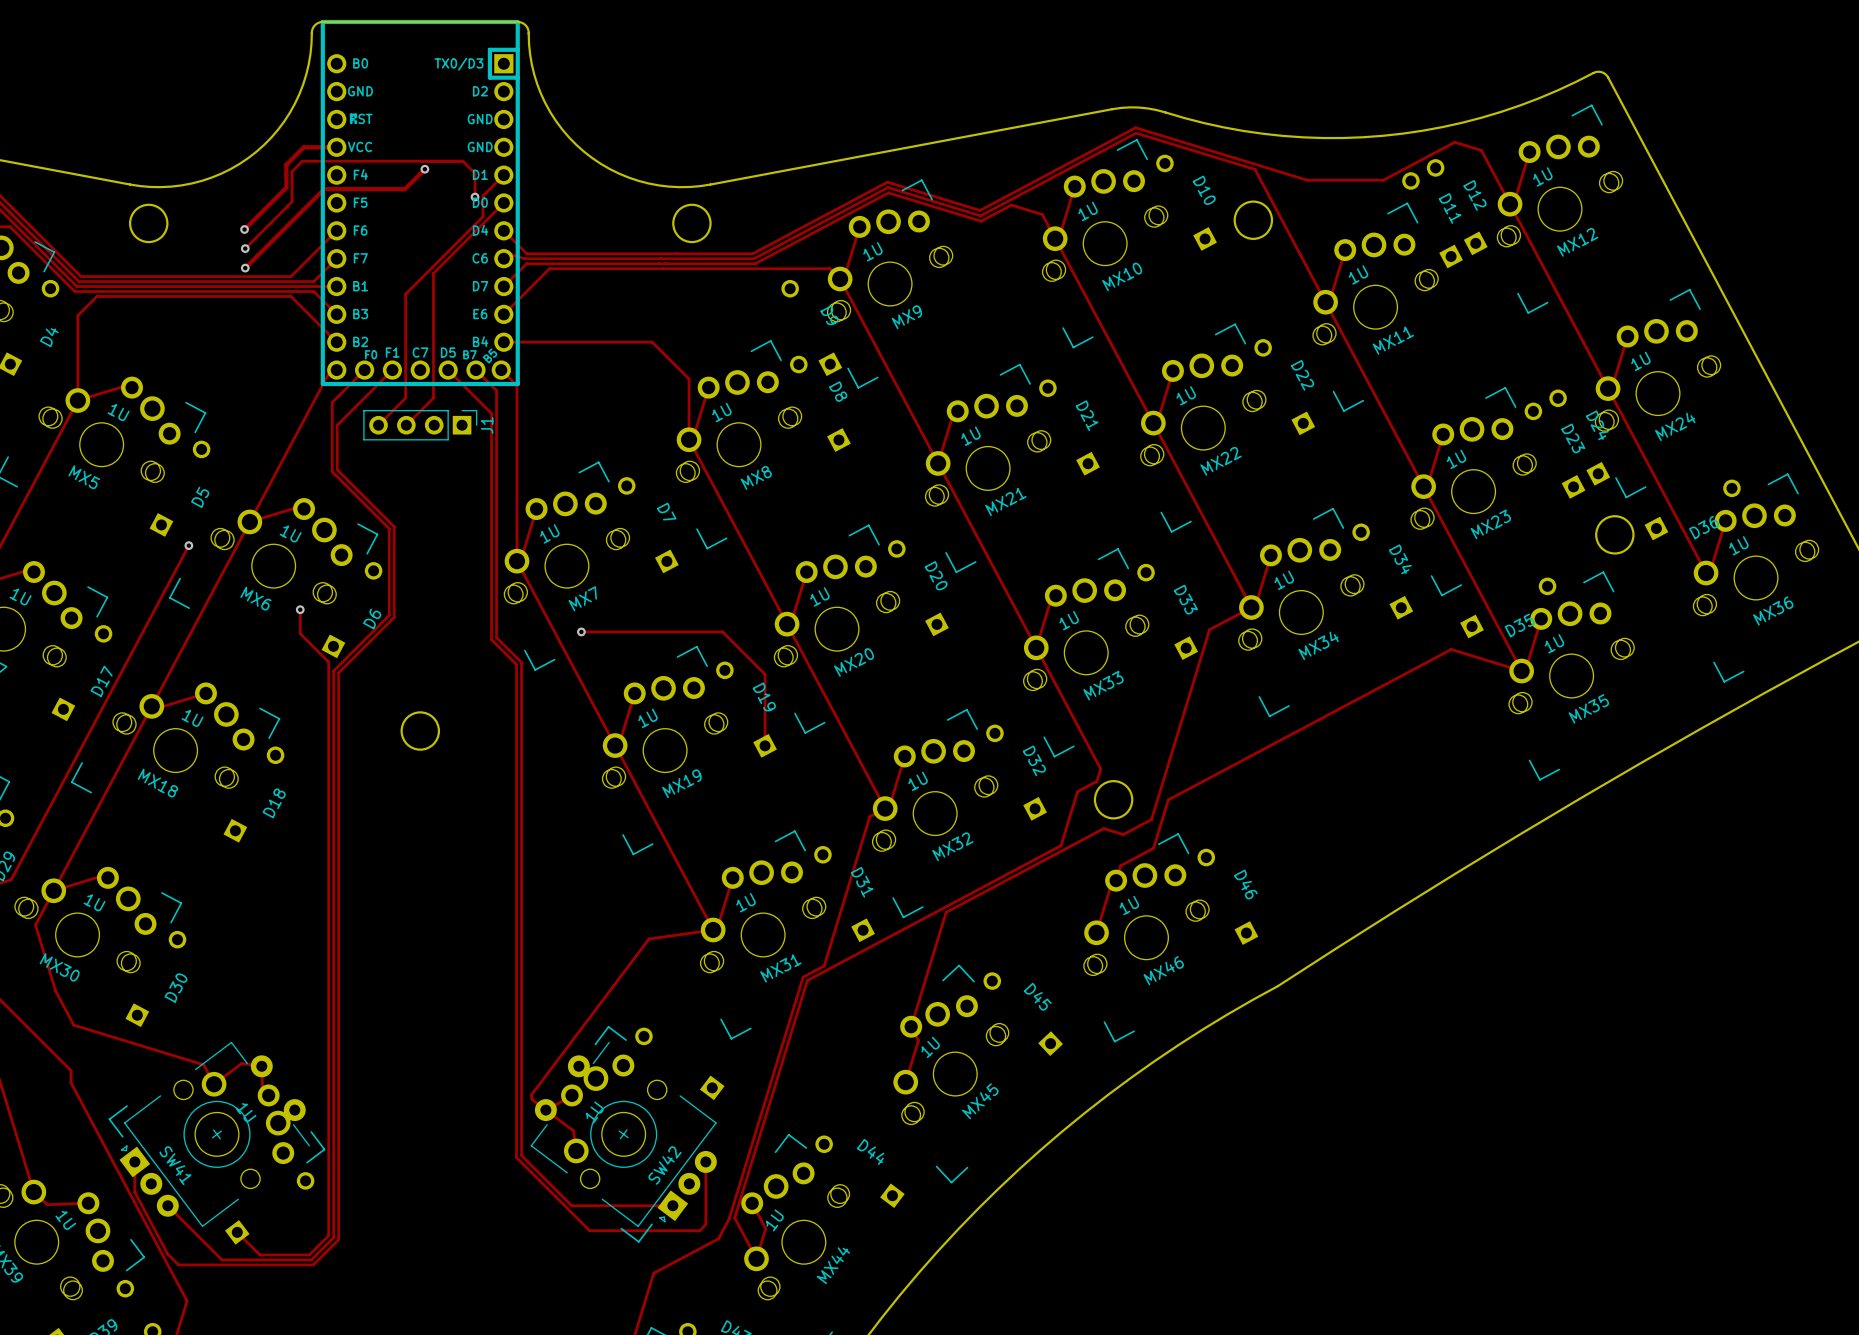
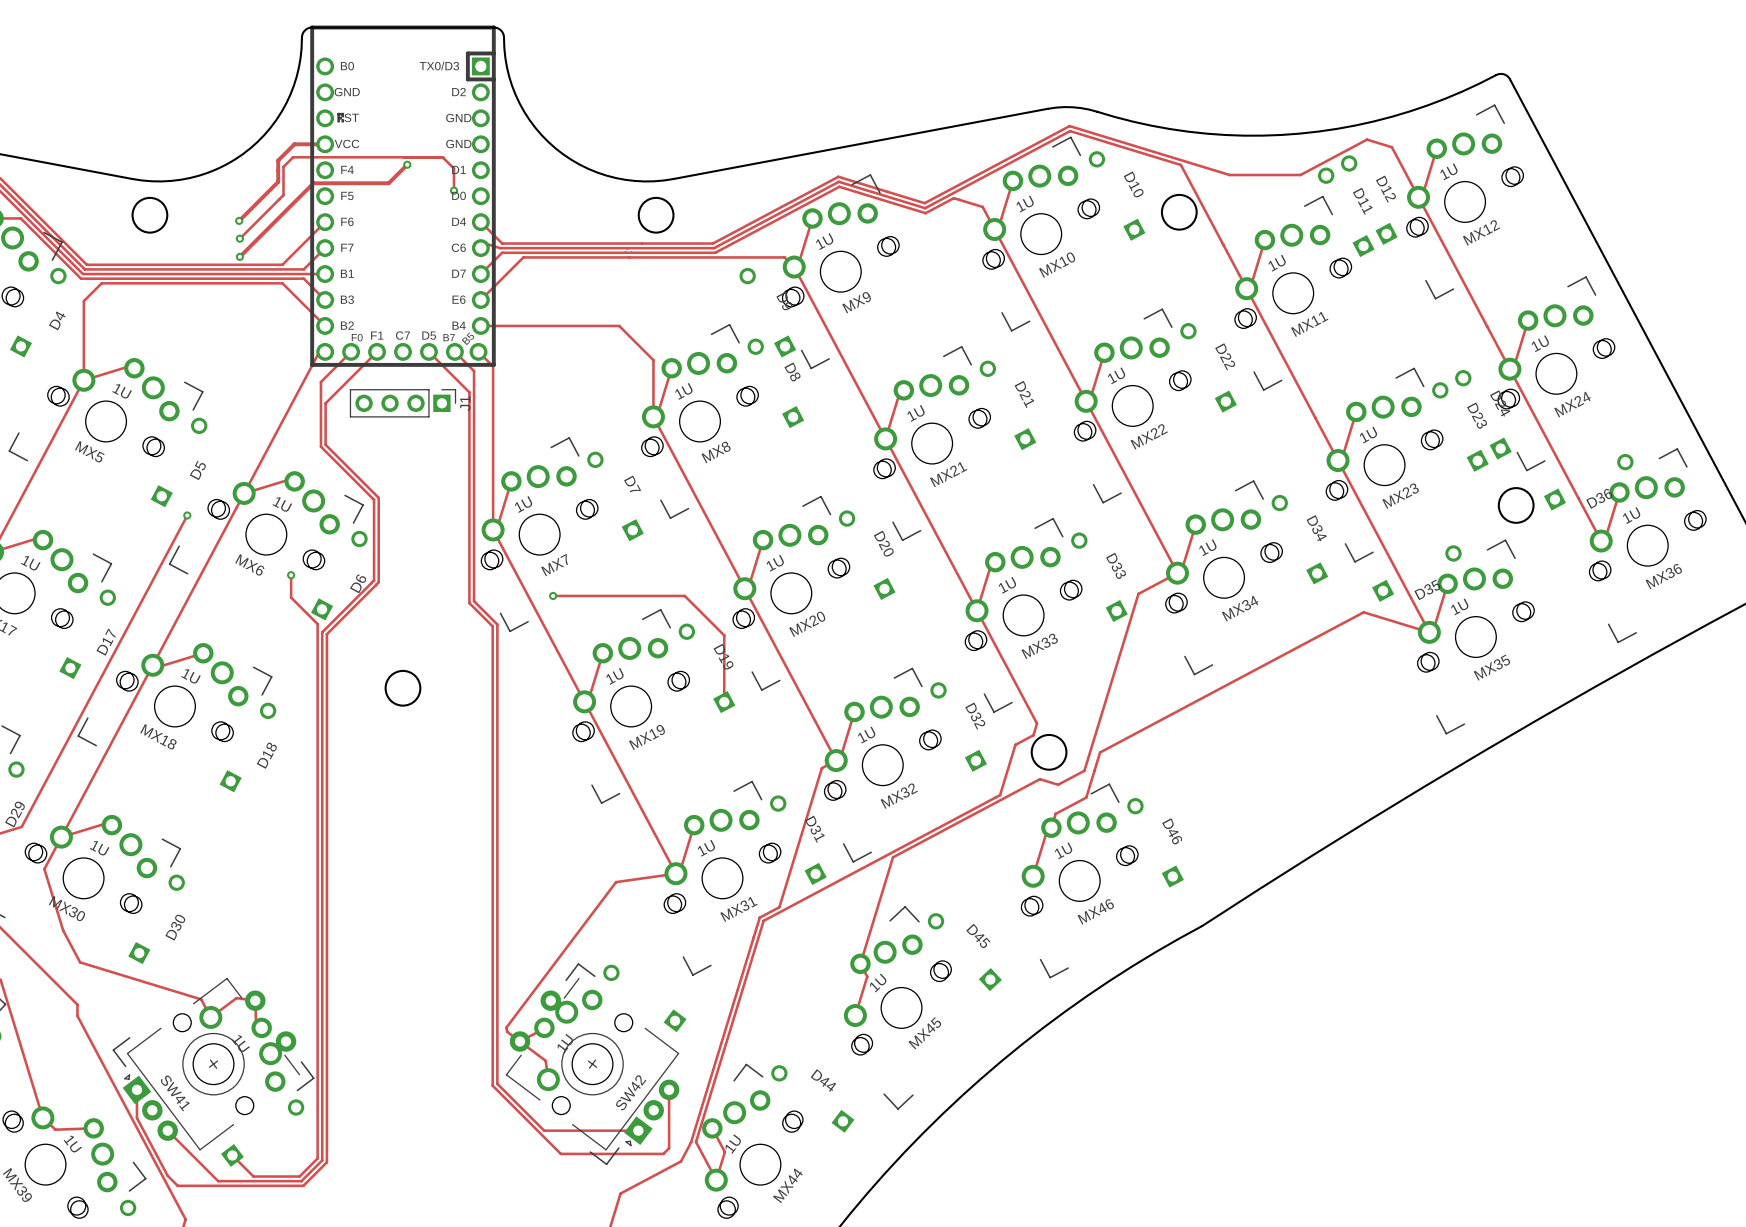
track: (503, 175) (482, 195) (482, 216) (405, 294) (405, 398) (378, 425) -> none
track: (503, 202) (433, 273) (433, 398) (406, 425) -> none

